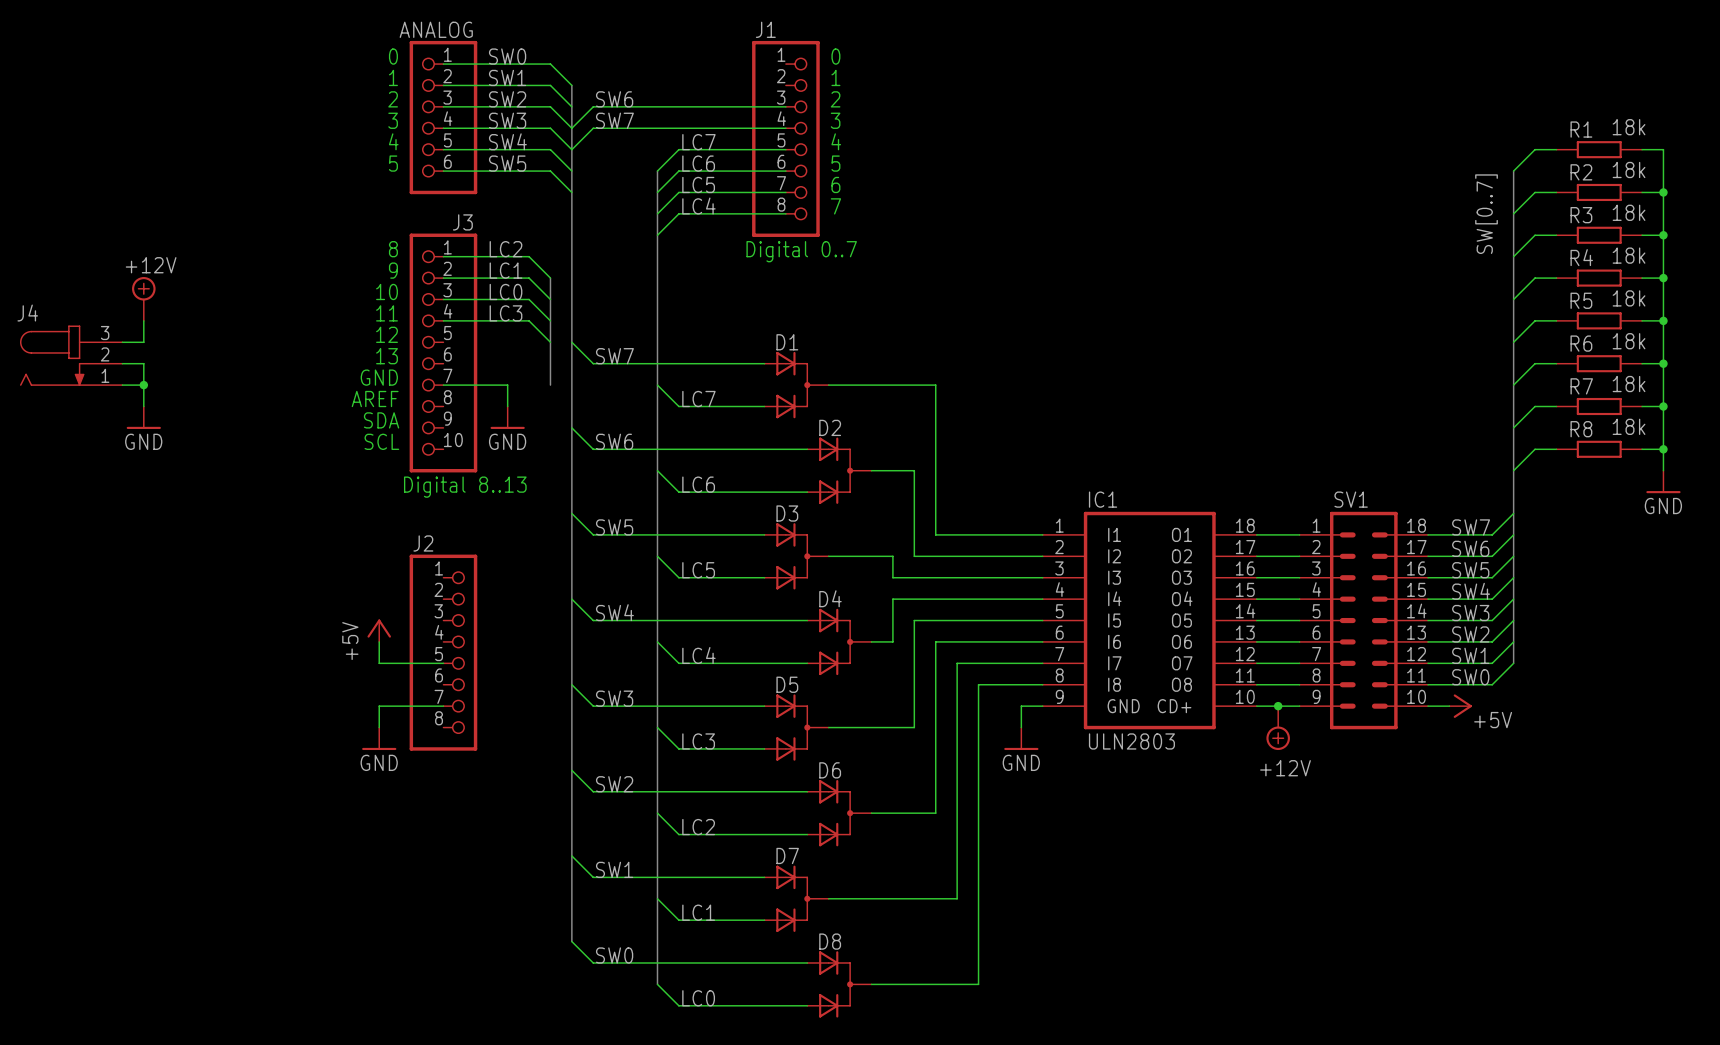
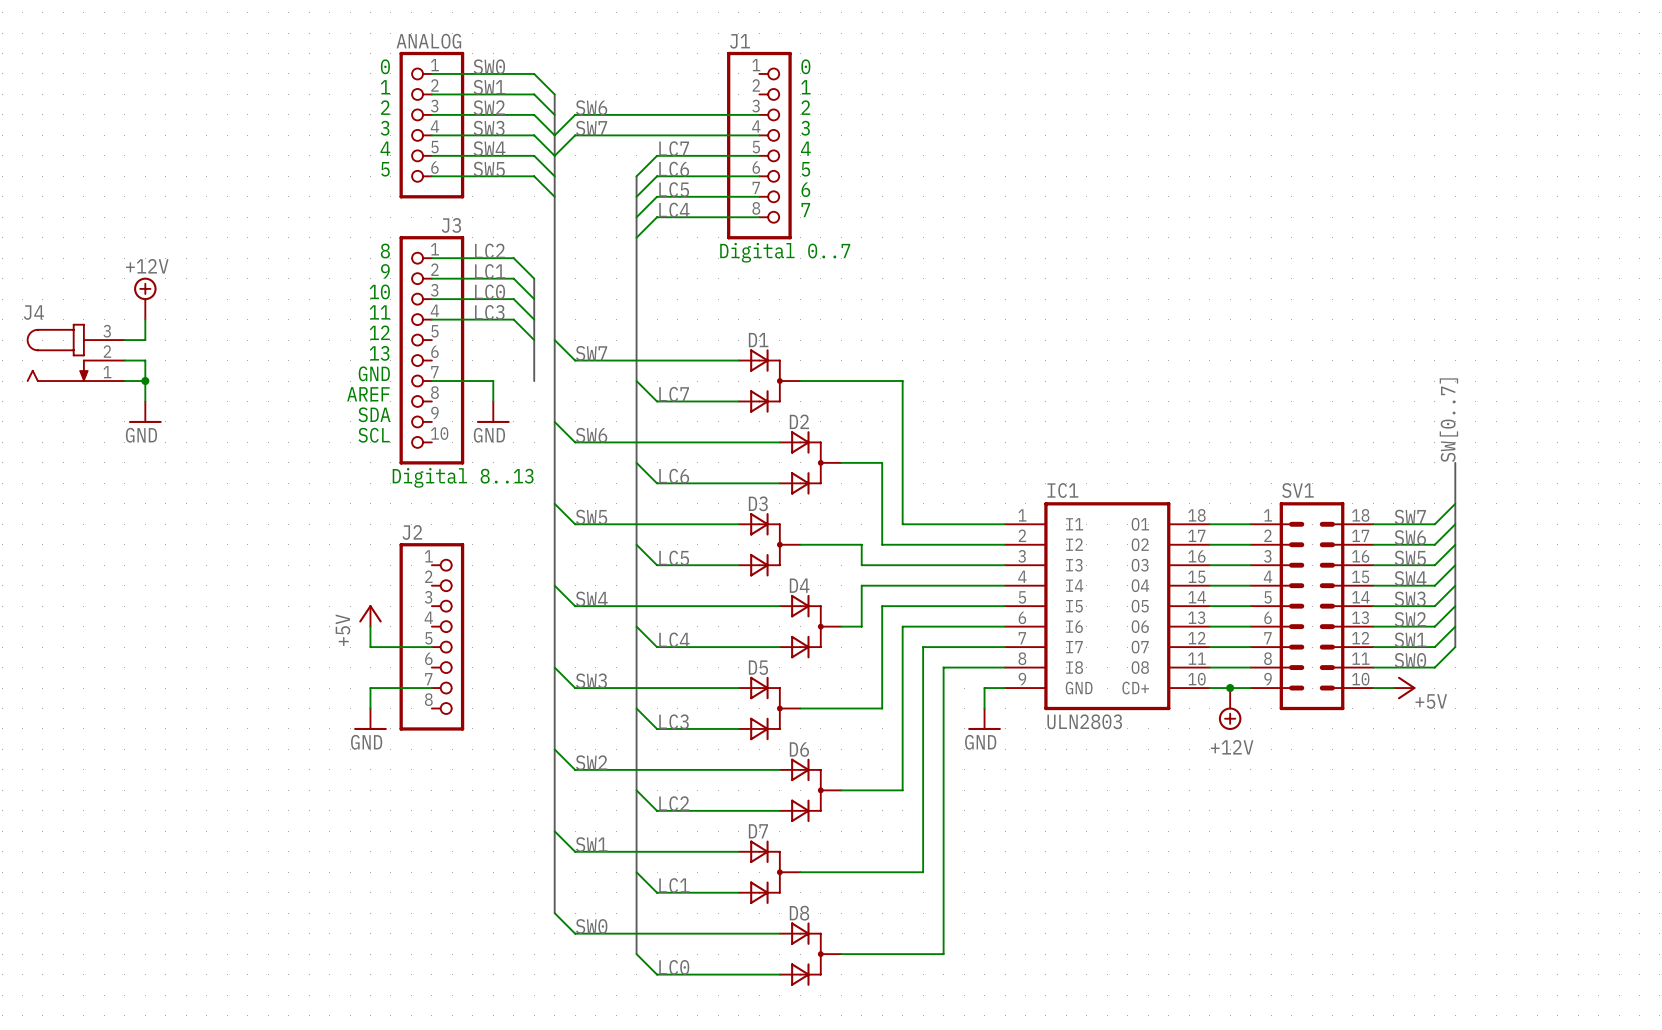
wire: (1556, 149) (1535, 149) (1513, 171) -> none
R1: 18k (1599, 149) -> none
wire: (1642, 149) (1663, 149) (1663, 470) -> none
bus: (1513, 171) (1513, 470) -> none
wire: (1556, 192) (1535, 192) (1513, 213) -> none
R2: 18k (1599, 192) -> none
wire: (1642, 192) (1663, 192) -> none
junction: (1663, 192) -> none
label: SW[0..7] (1486, 214) -> none
wire: (1556, 235) (1535, 235) (1513, 256) -> none
R3: 18k (1599, 235) -> none
wire: (1642, 235) (1663, 235) -> none
junction: (1663, 235) -> none
wire: (1556, 278) (1535, 278) (1513, 299) -> none
R4: 18k (1599, 278) -> none
wire: (1642, 278) (1663, 278) -> none
junction: (1663, 278) -> none
wire: (1556, 320) (1535, 320) (1513, 342) -> none
R5: 18k (1599, 320) -> none
wire: (1642, 320) (1663, 320) -> none
junction: (1663, 320) -> none
wire: (1556, 363) (1535, 363) (1513, 385) -> none
R6: 18k (1599, 363) -> none
wire: (1642, 363) (1663, 363) -> none
junction: (1663, 363) -> none
wire: (1556, 406) (1535, 406) (1513, 427) -> none
R7: 18k (1599, 406) -> none
wire: (1642, 406) (1663, 406) -> none
junction: (1663, 406) -> none
label: none -> SW[0..7] (1448, 420)
wire: (1556, 449) (1535, 449) (1513, 470) -> none
R8: 18k (1599, 449) -> none
wire: (1642, 449) (1663, 449) -> none
junction: (1663, 449) -> none
power symbol: GND (1663, 481) -> none

